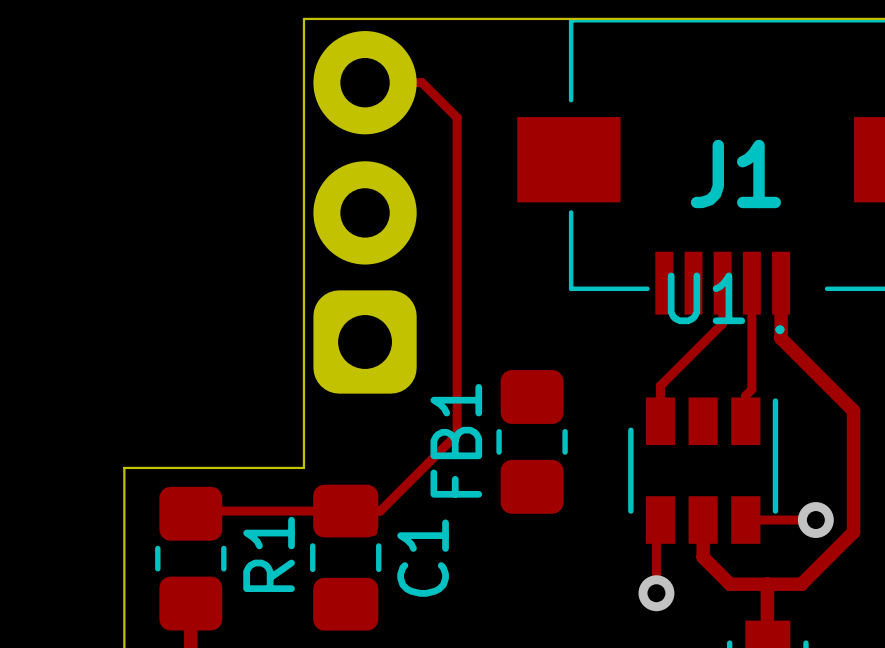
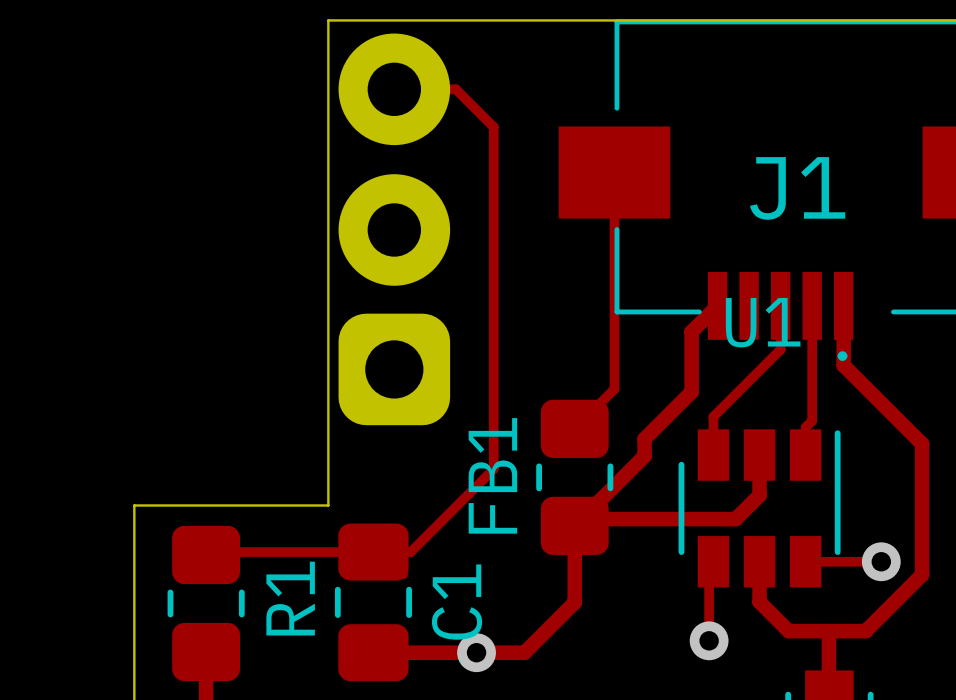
track: none -> (614, 172) (614, 389) (574, 428)
track: none -> (717, 305) (691, 331) (691, 391) (644, 438) (644, 456) (574, 525) (574, 602) (524, 652) (373, 652)
track: none -> (759, 455) (759, 495) (735, 519) (581, 519)
via: none -> (476, 652)

